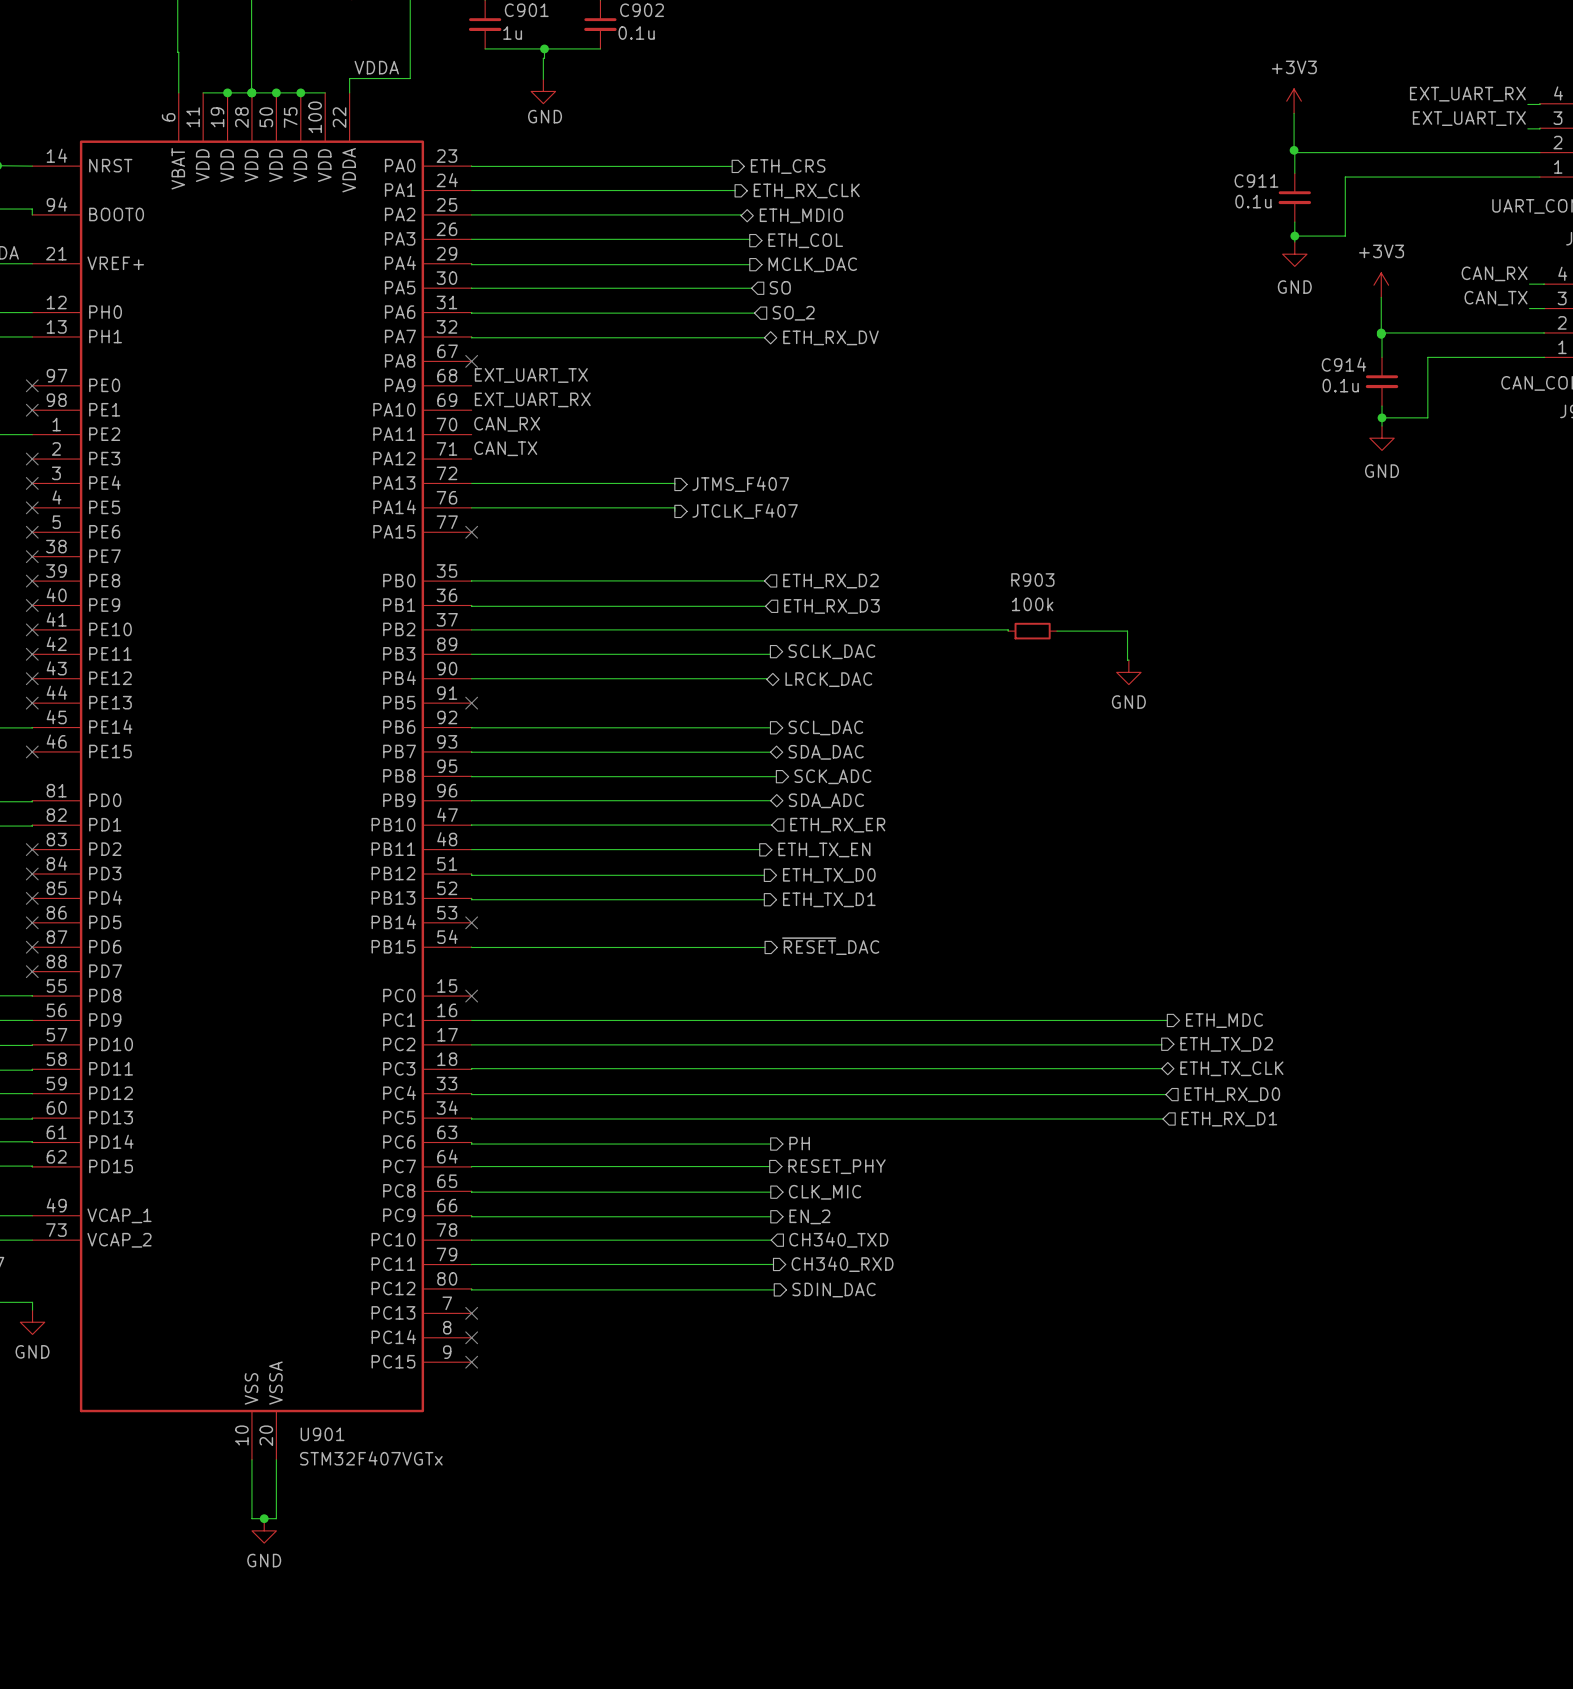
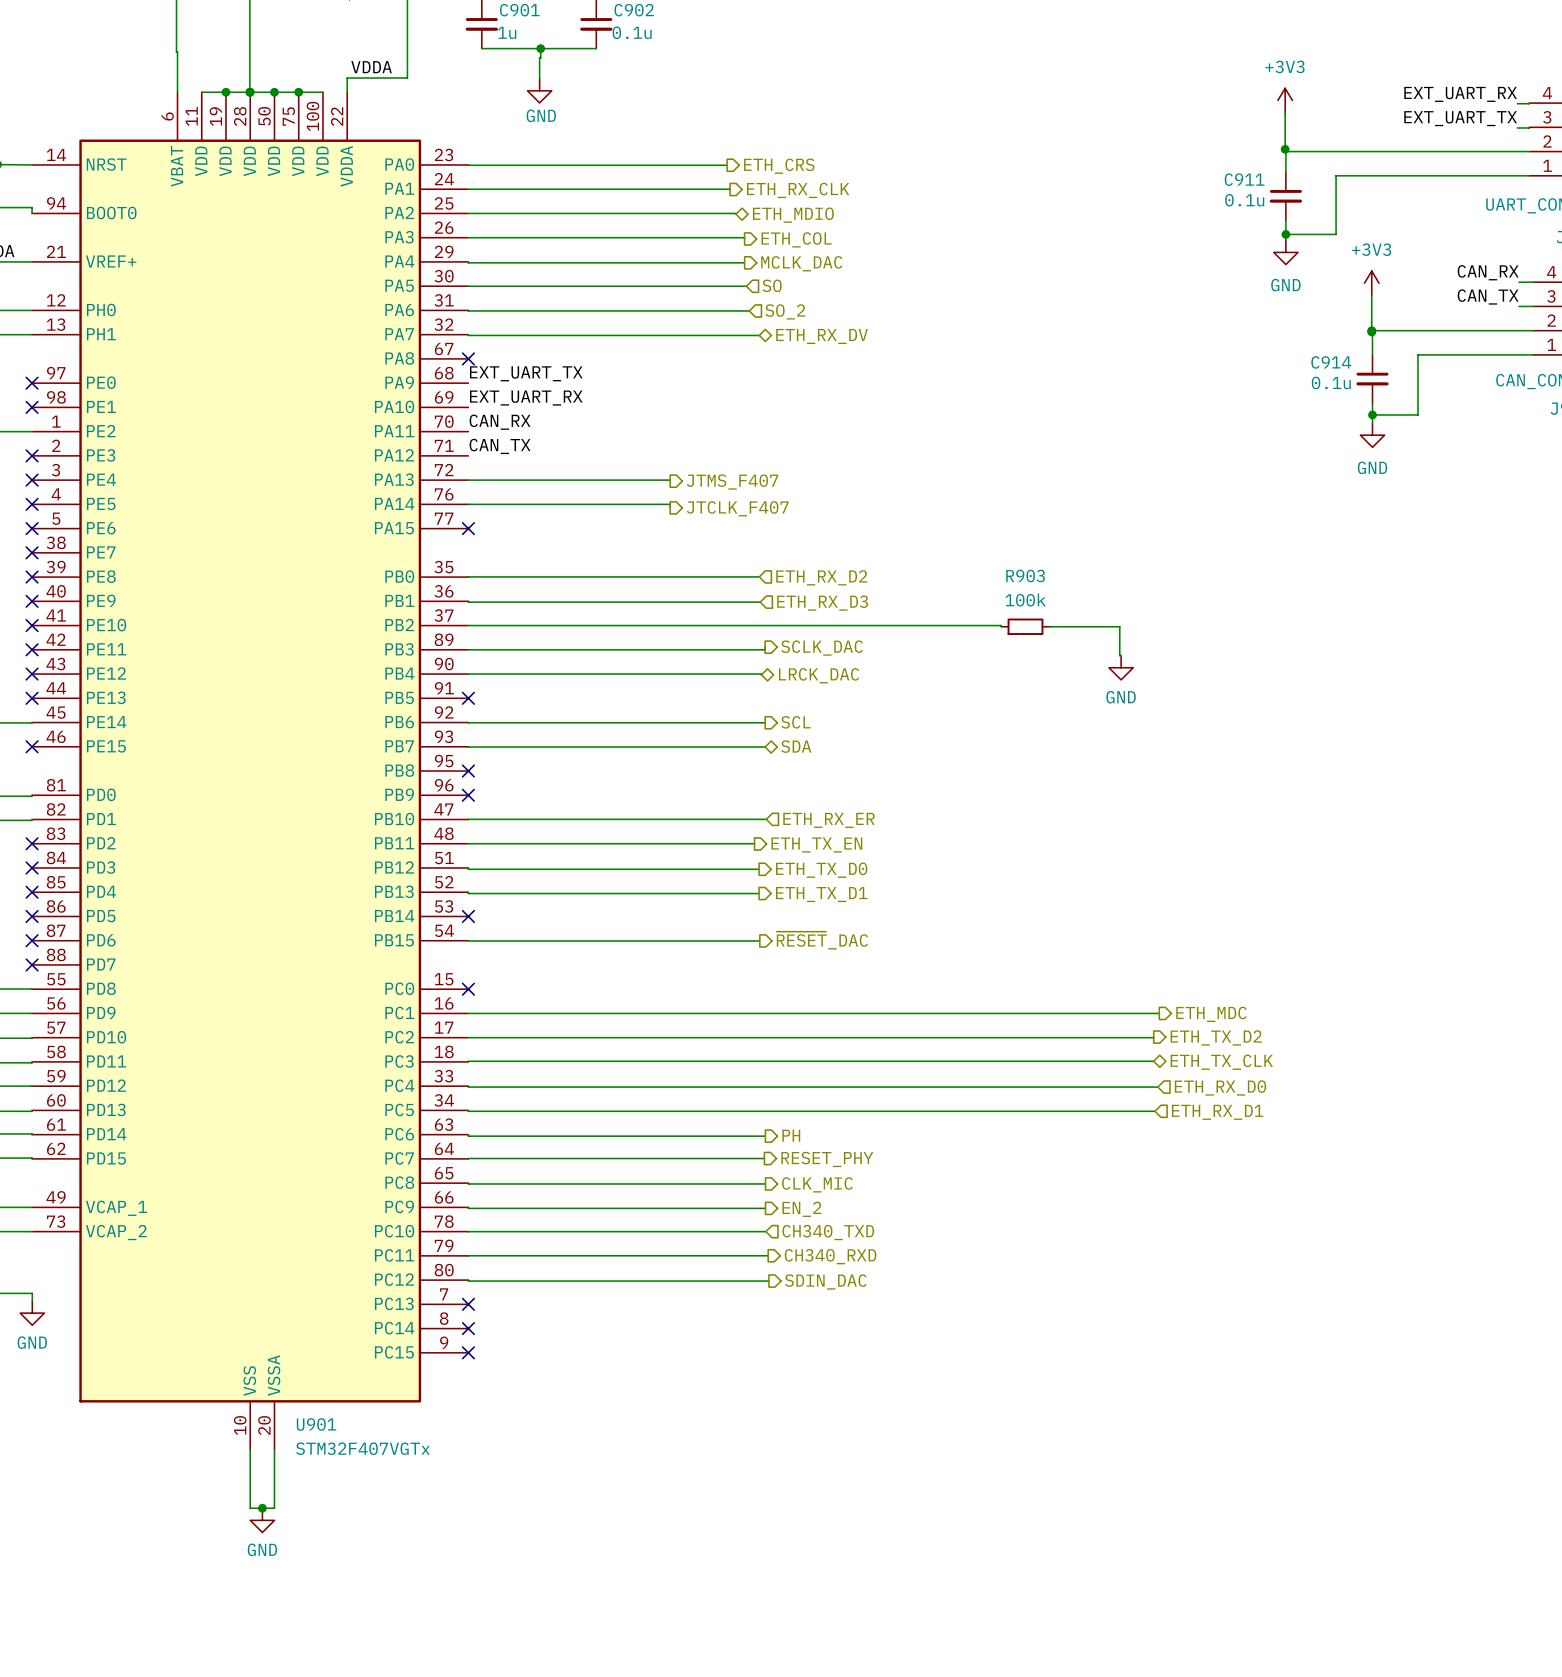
hierarchical label: SCL_DAC (825, 727) -> SCL (796, 722)
hierarchical label: SDA_DAC (826, 752) -> SDA (796, 746)
wire: (471, 776) (776, 776) -> none
no-connect mark: none -> (468, 771)
hierarchical label: SCK_ADC (832, 776) -> none
wire: (471, 800) (770, 800) -> none
no-connect mark: none -> (468, 795)
hierarchical label: SDA_ADC (826, 800) -> none

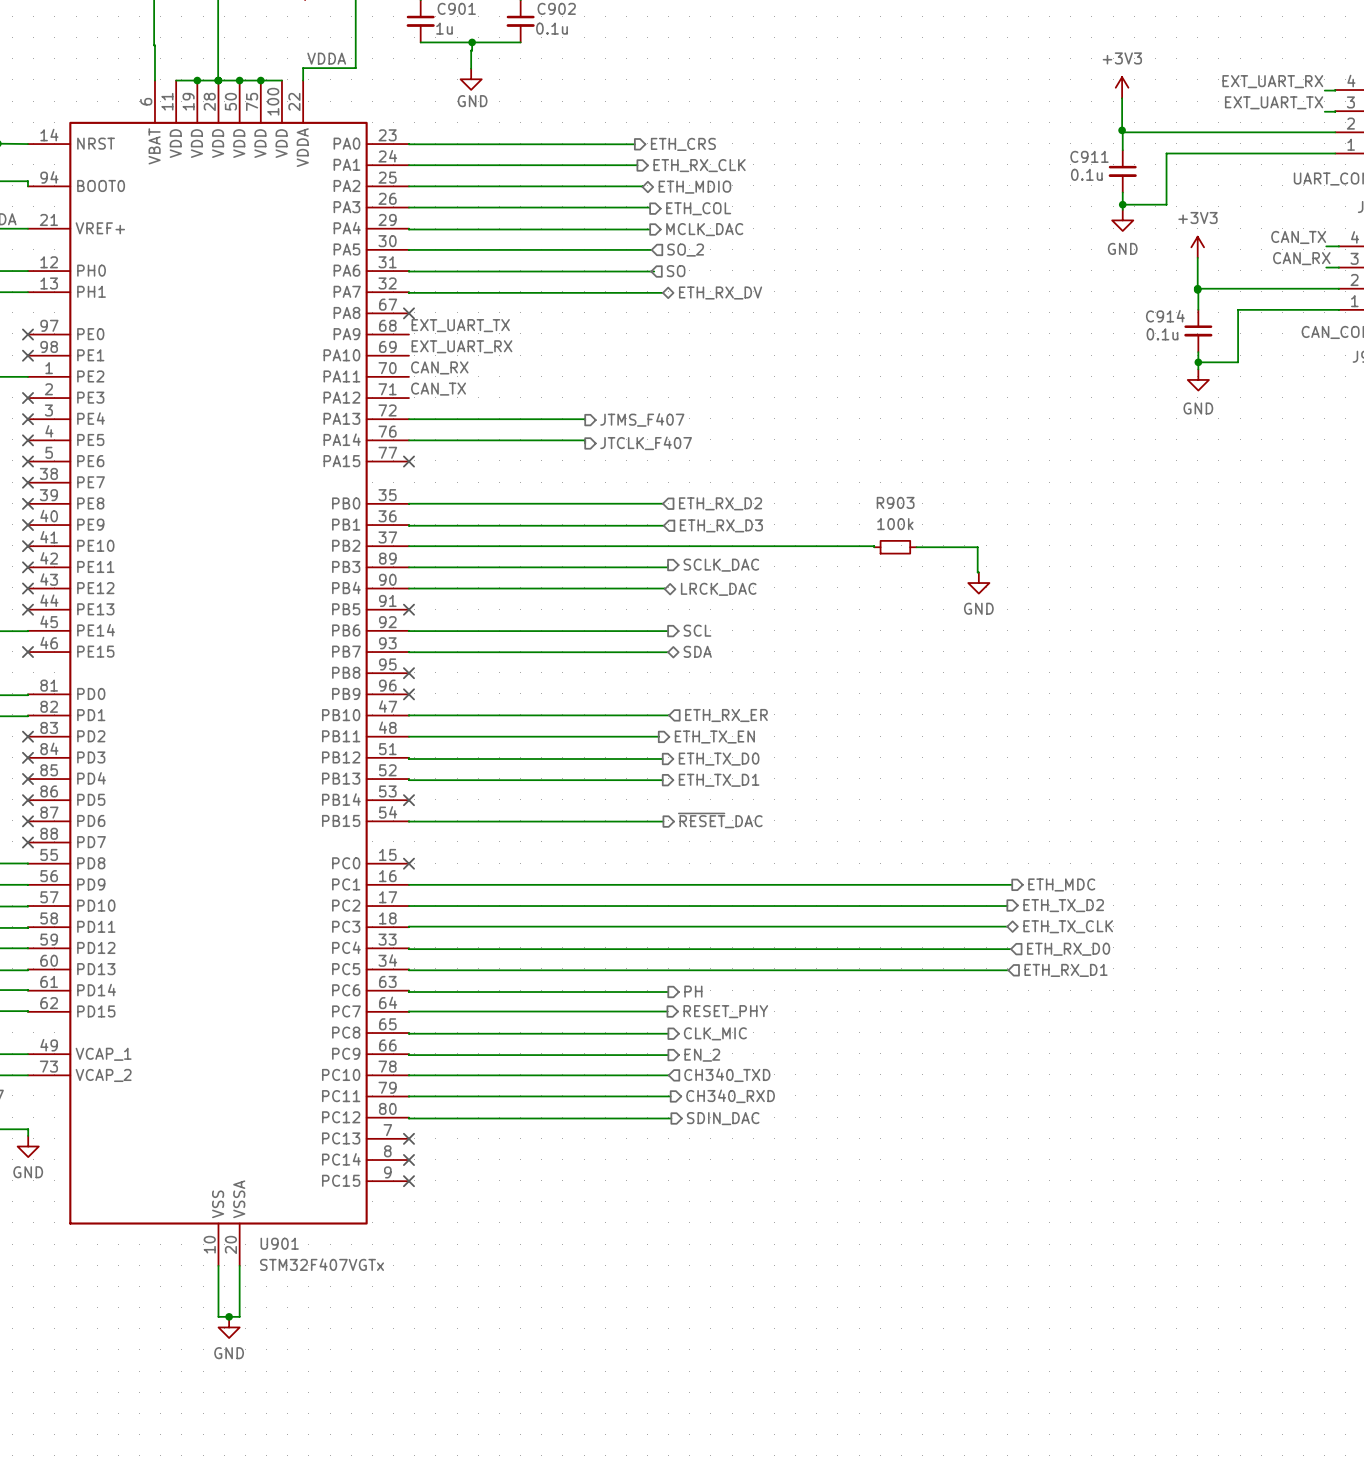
label: CAN_RX (1488, 272) -> CAN_TX (1298, 237)
hierarchical label: SO (772, 285) -> SO_2 (685, 250)
label: CAN_TX (1488, 296) -> CAN_RX (1301, 258)
hierarchical label: SO_2 (785, 311) -> SO (676, 271)

